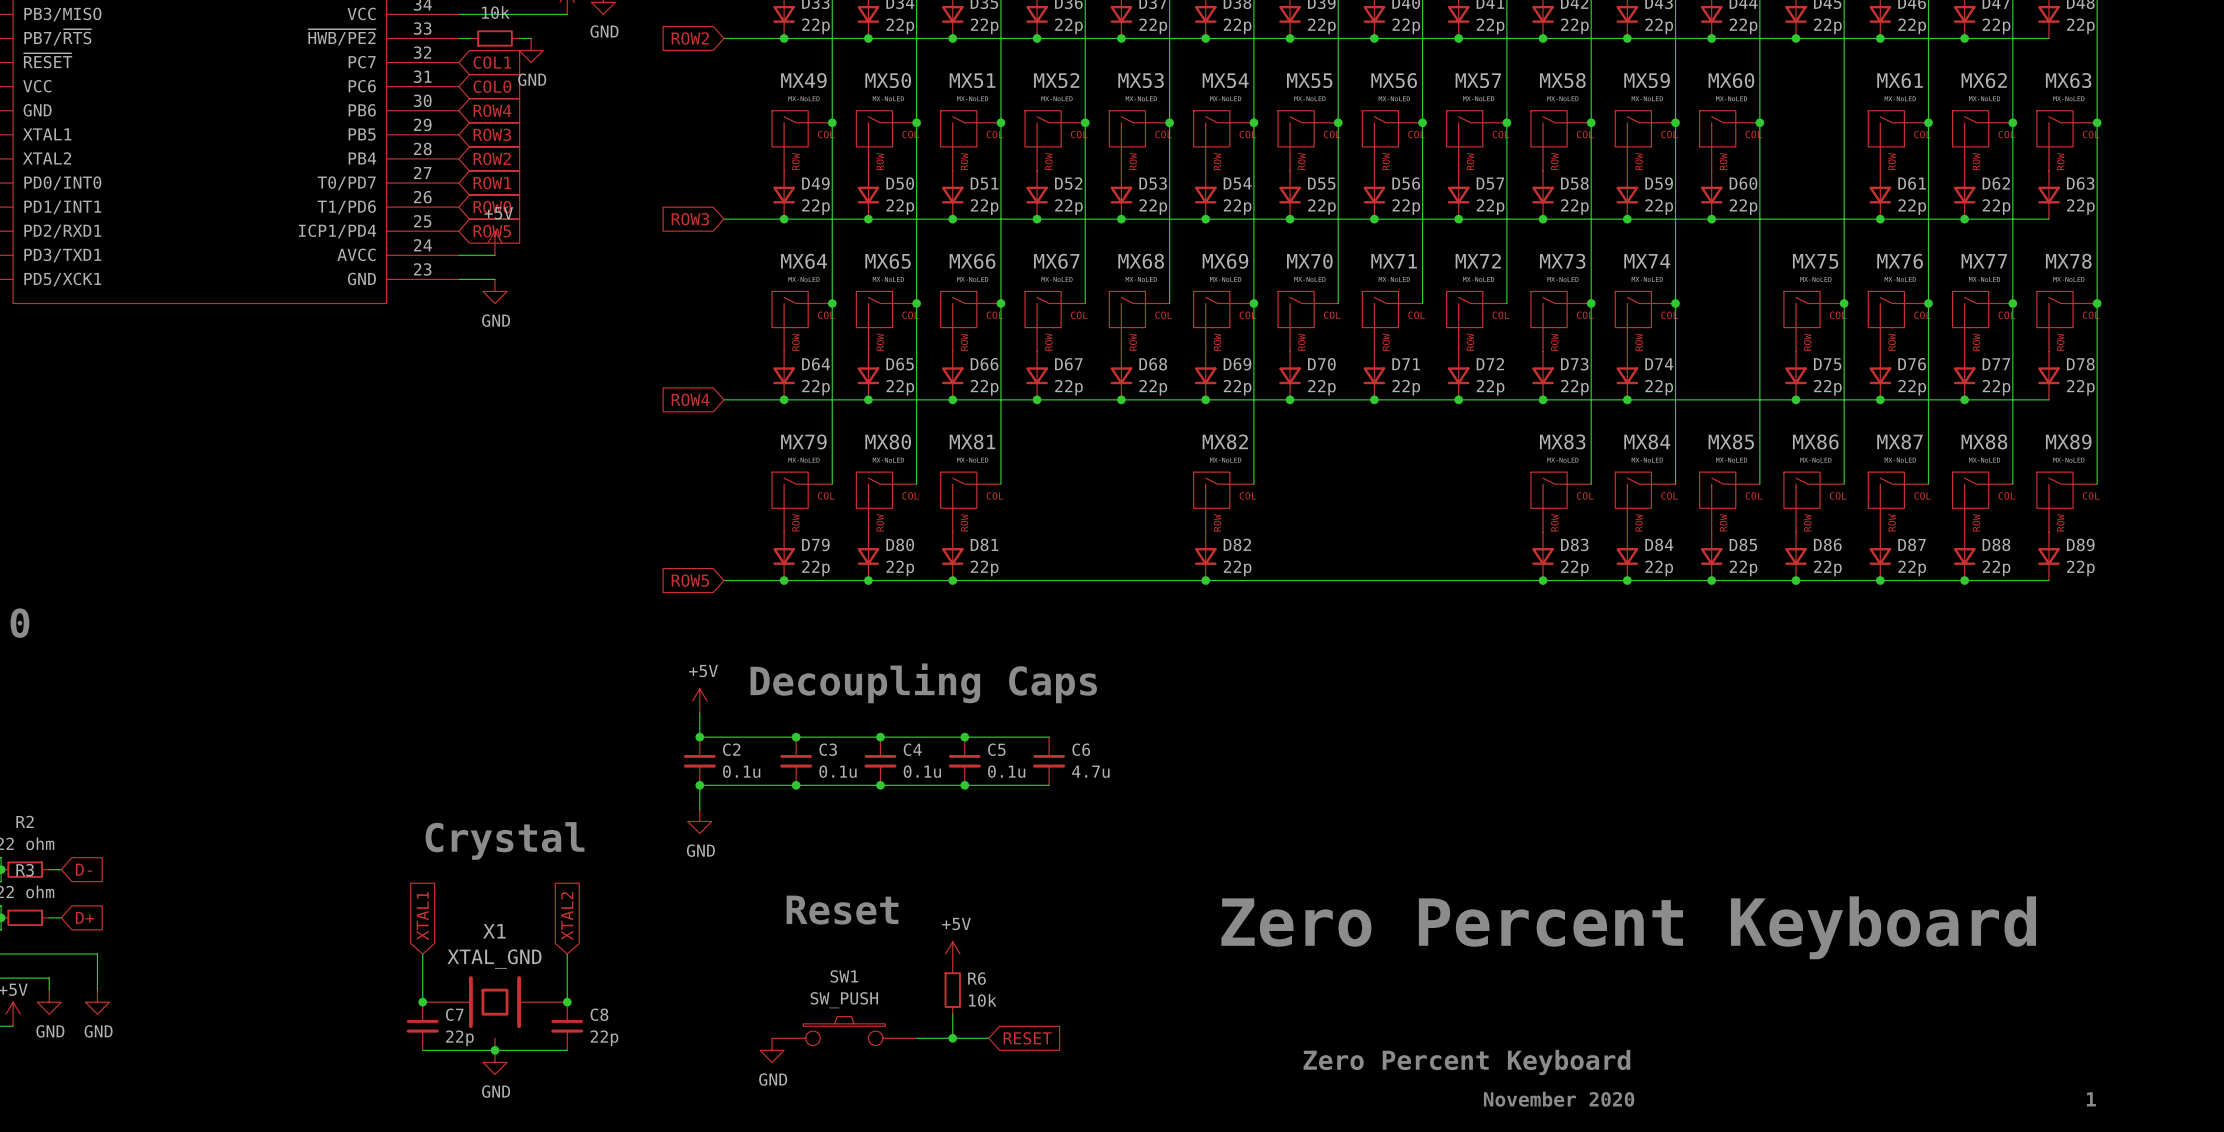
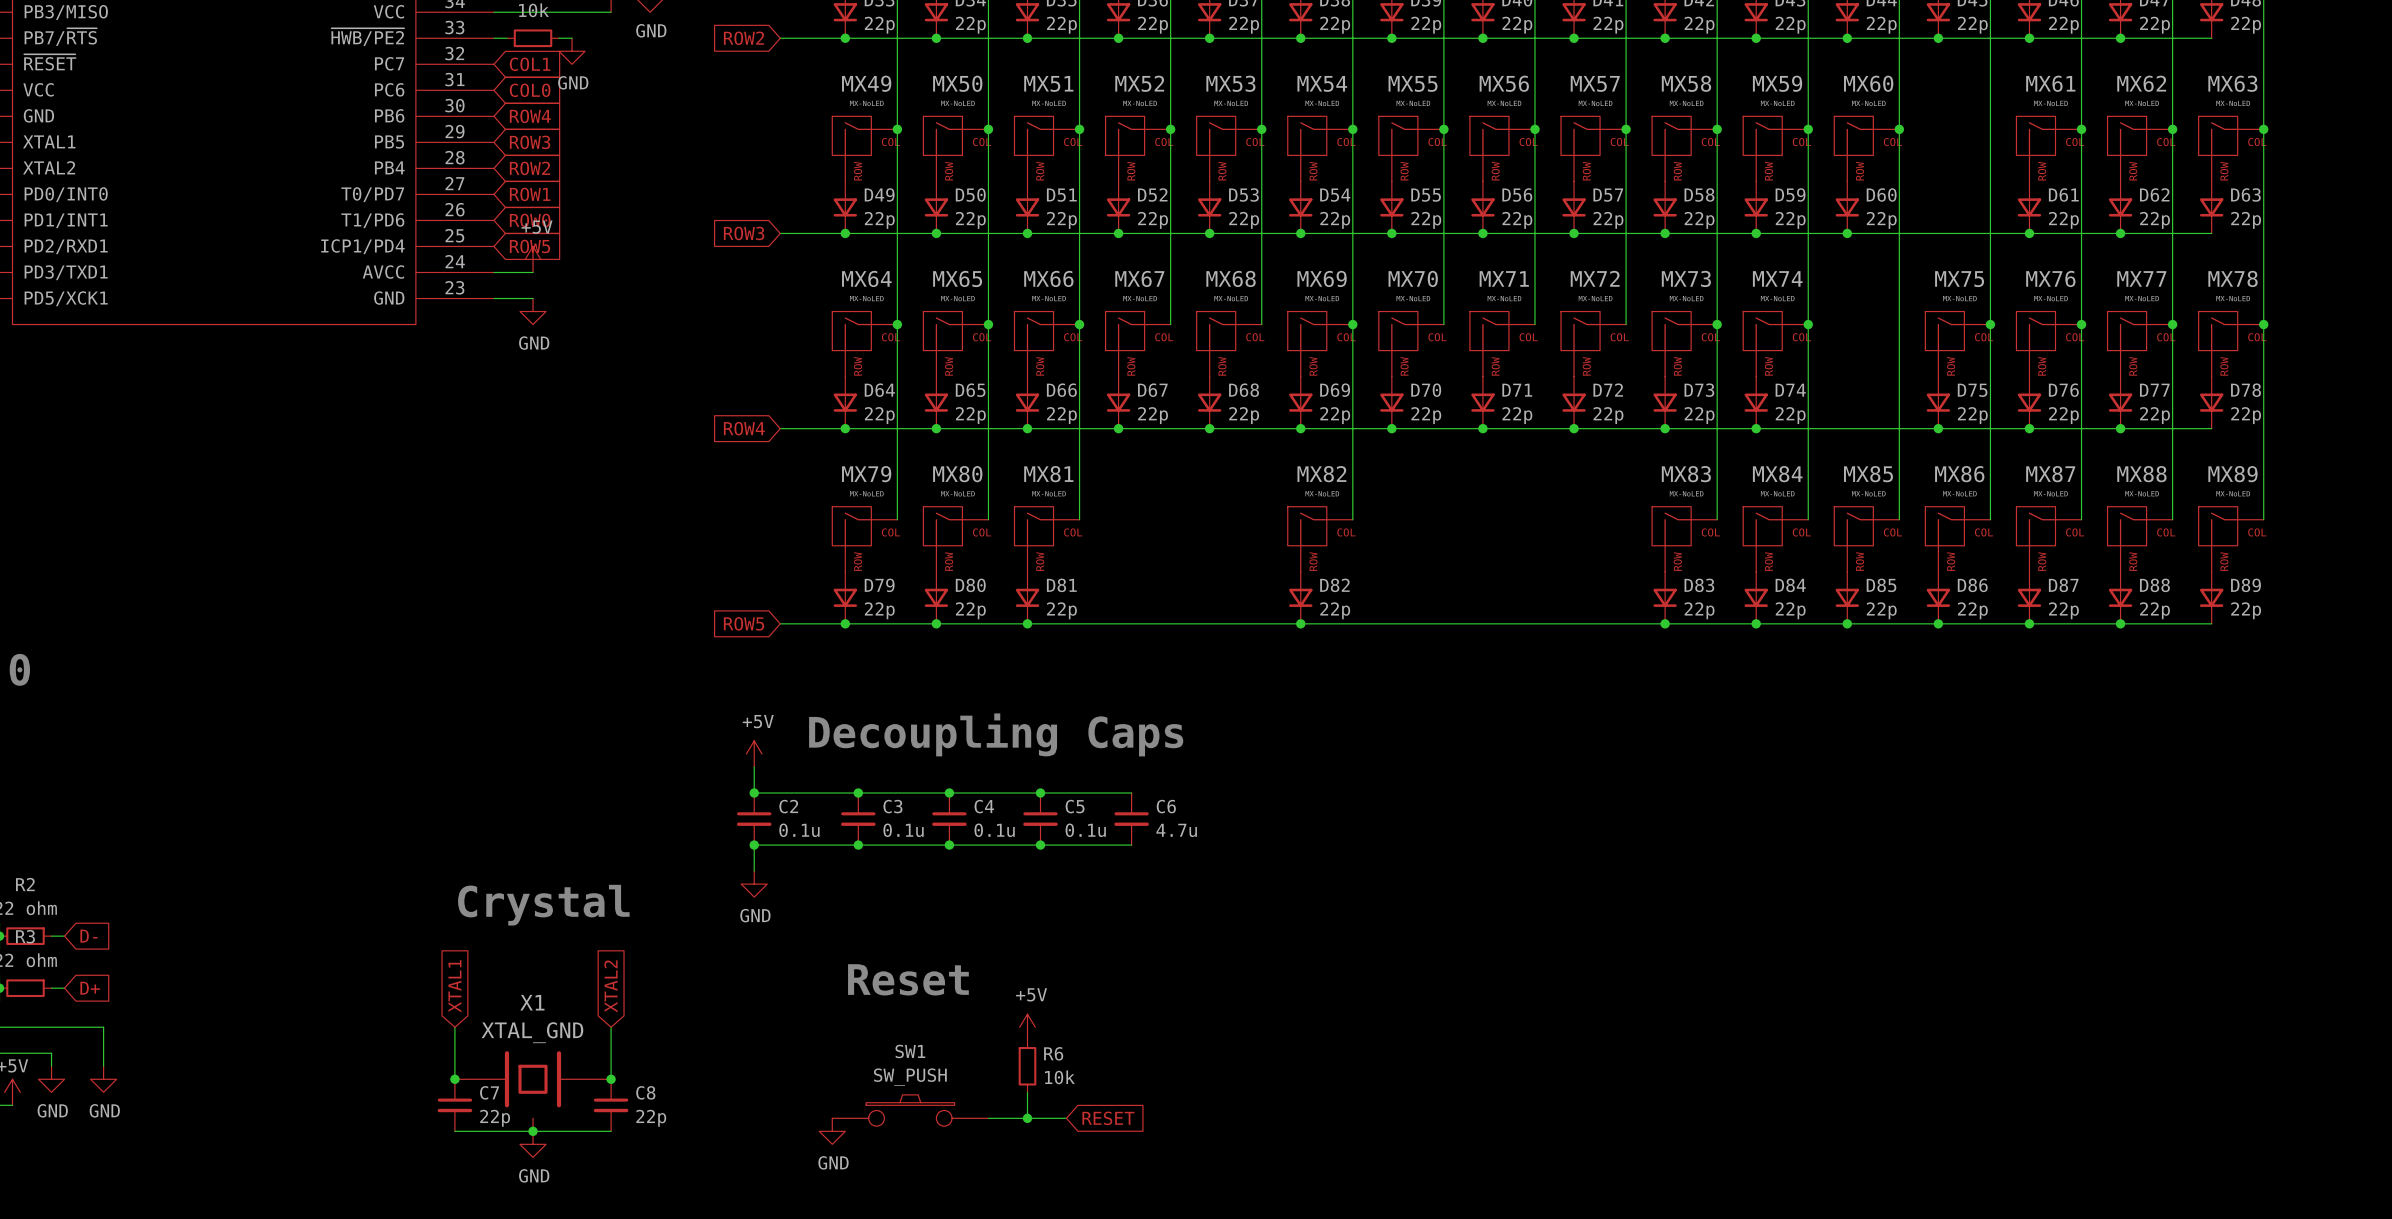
text: Zero Percent Keyboard (1628, 927) -> none
text: Zero Percent Keyboard (1466, 1062) -> none
text: November 2020 (1559, 1099) -> none
text: 1 (2091, 1099) -> none

